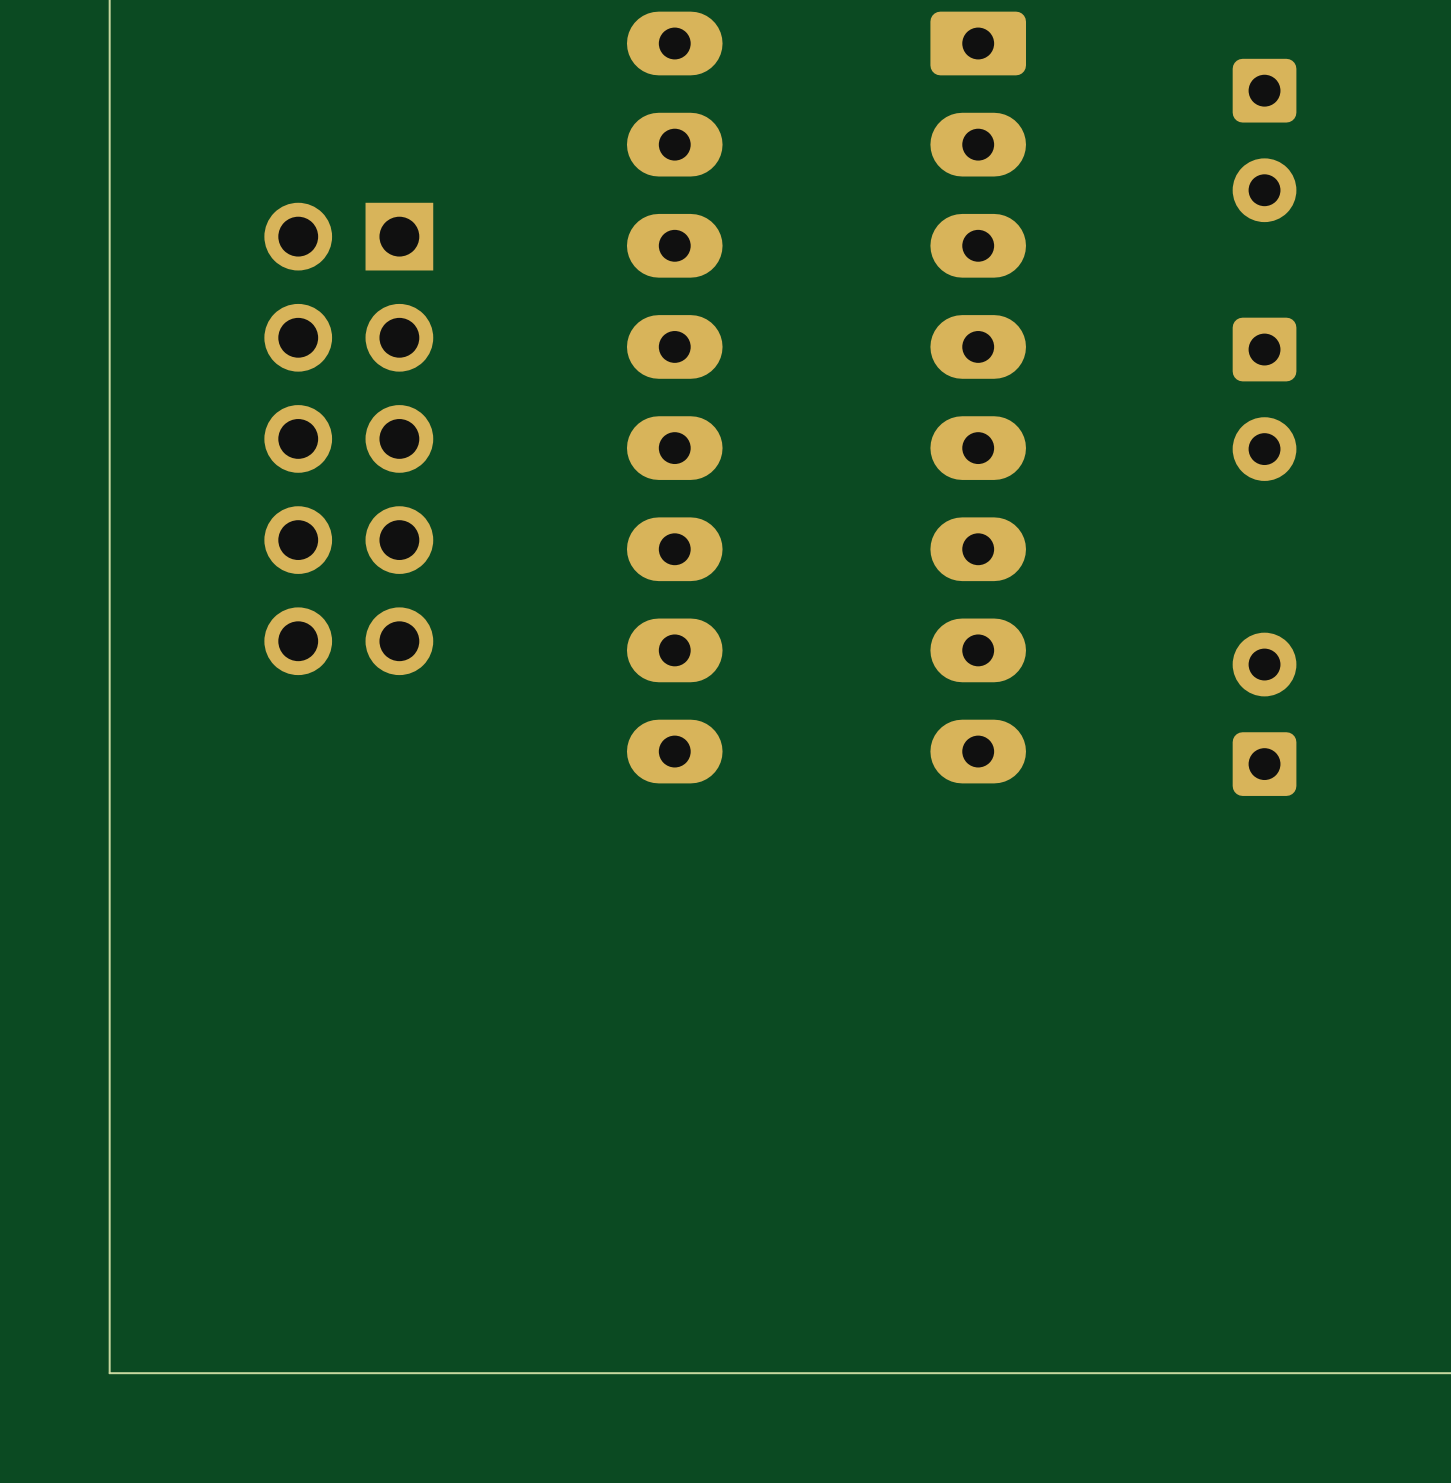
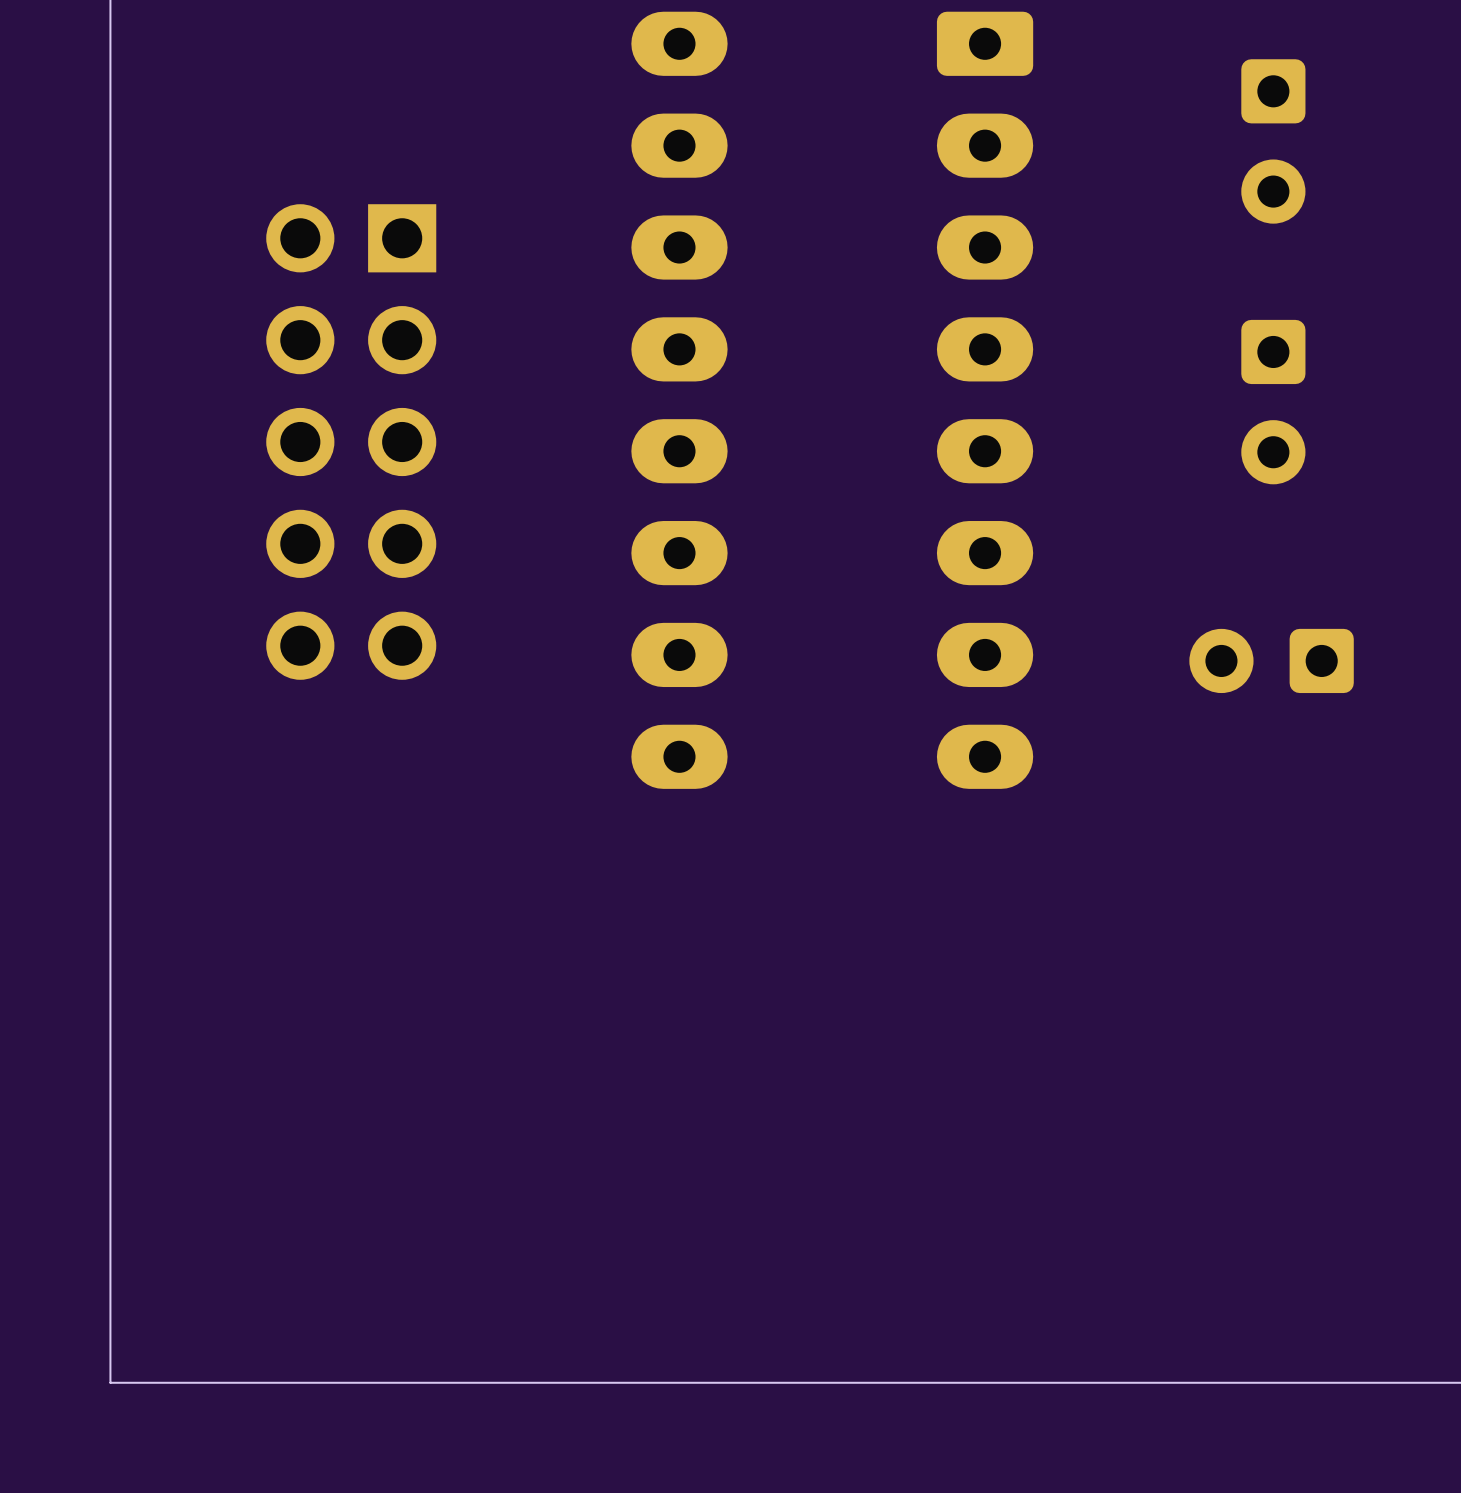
part rotation: 0° (1264, 714) -> 90° counterclockwise (1271, 660)

